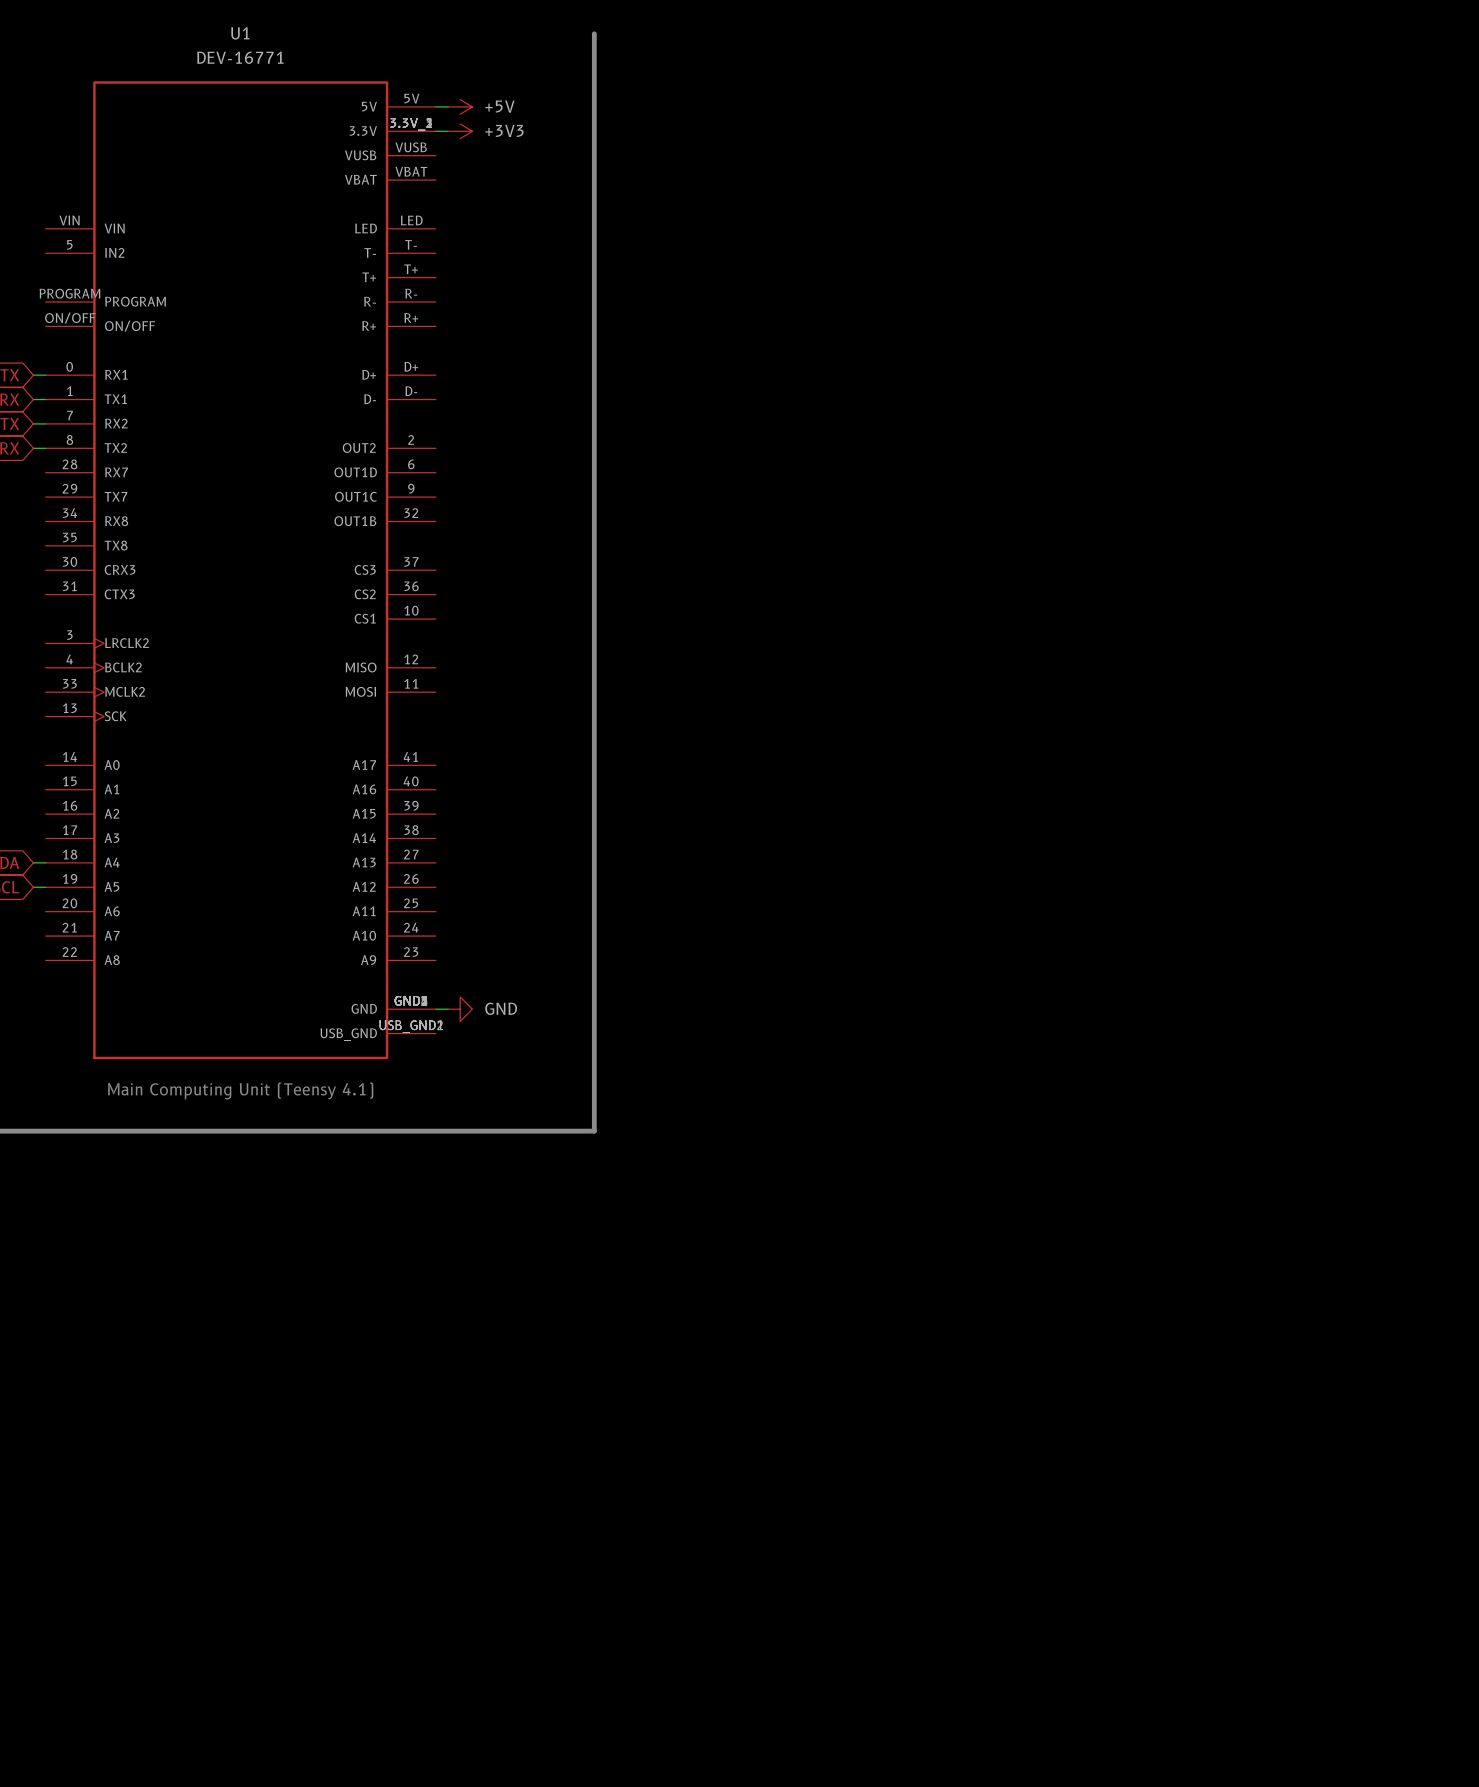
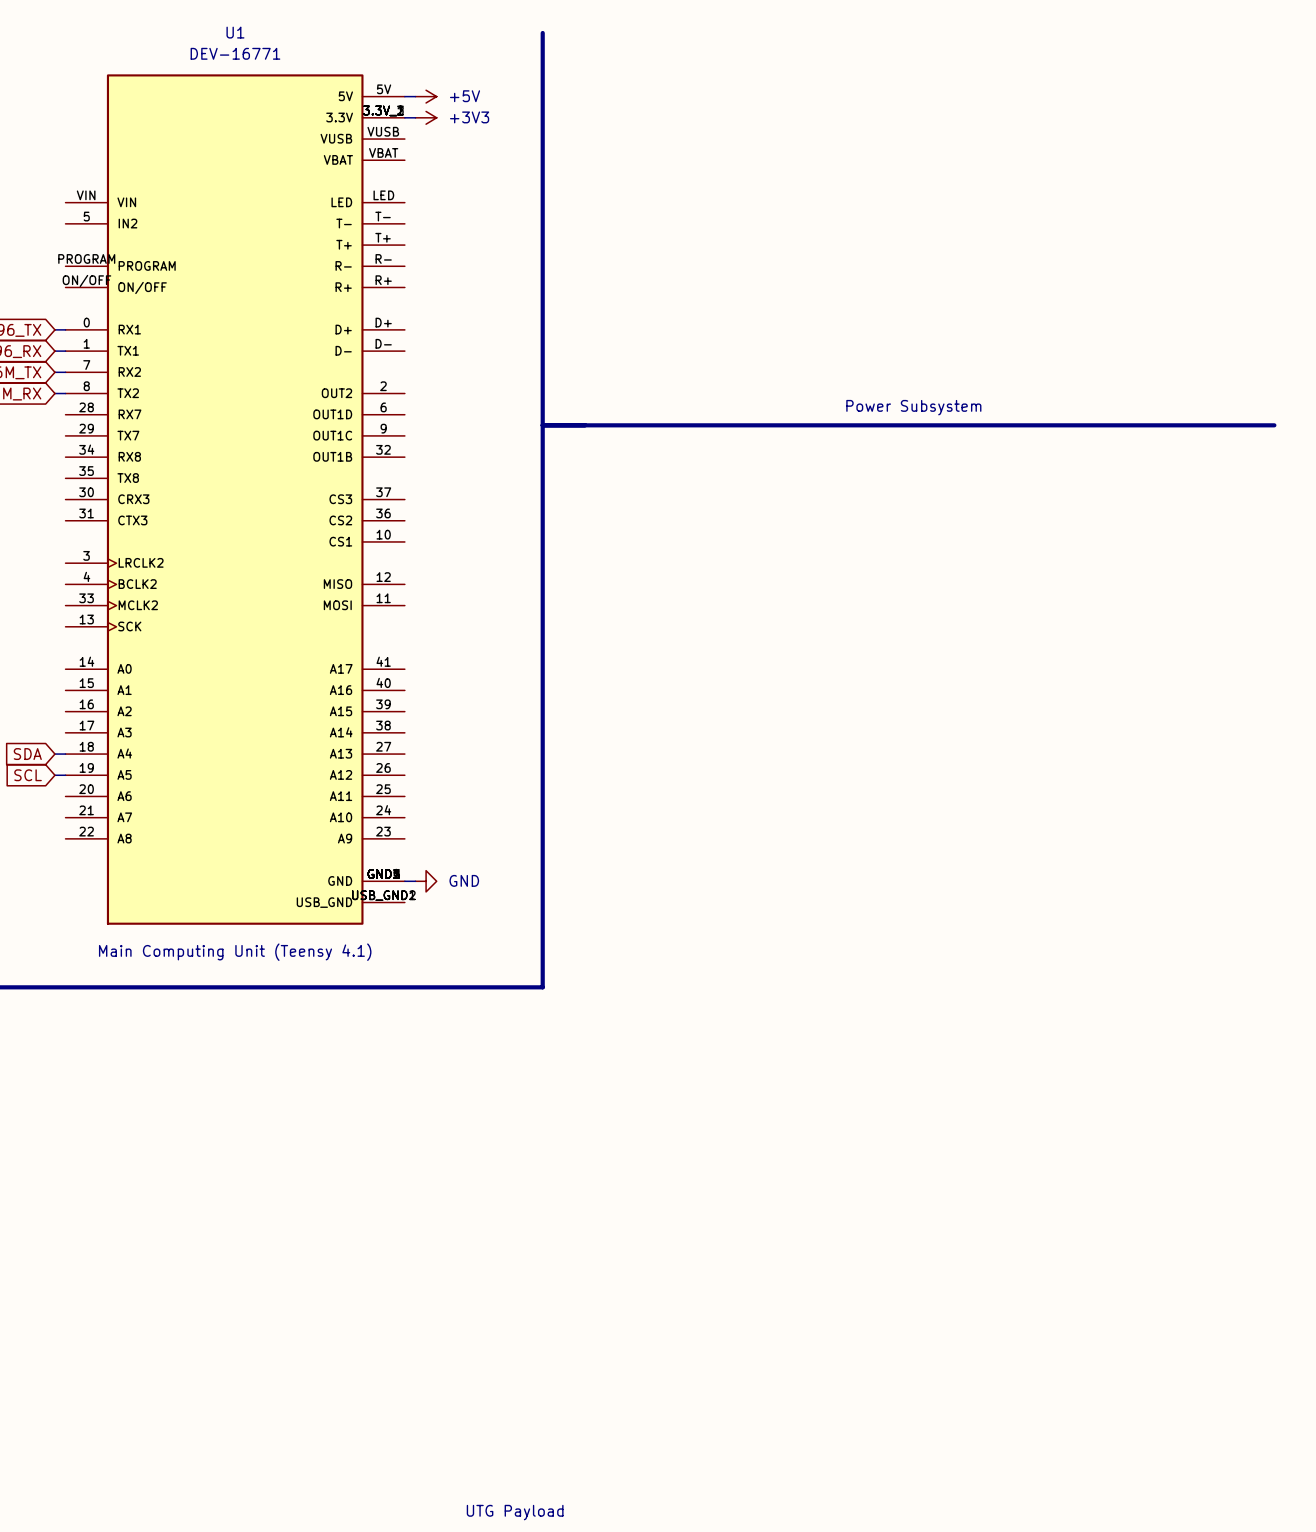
text: none -> Power Subsystem (913, 407)
line: none -> (542, 425) (1274, 425)
text: none -> UTG Payload (515, 1512)

